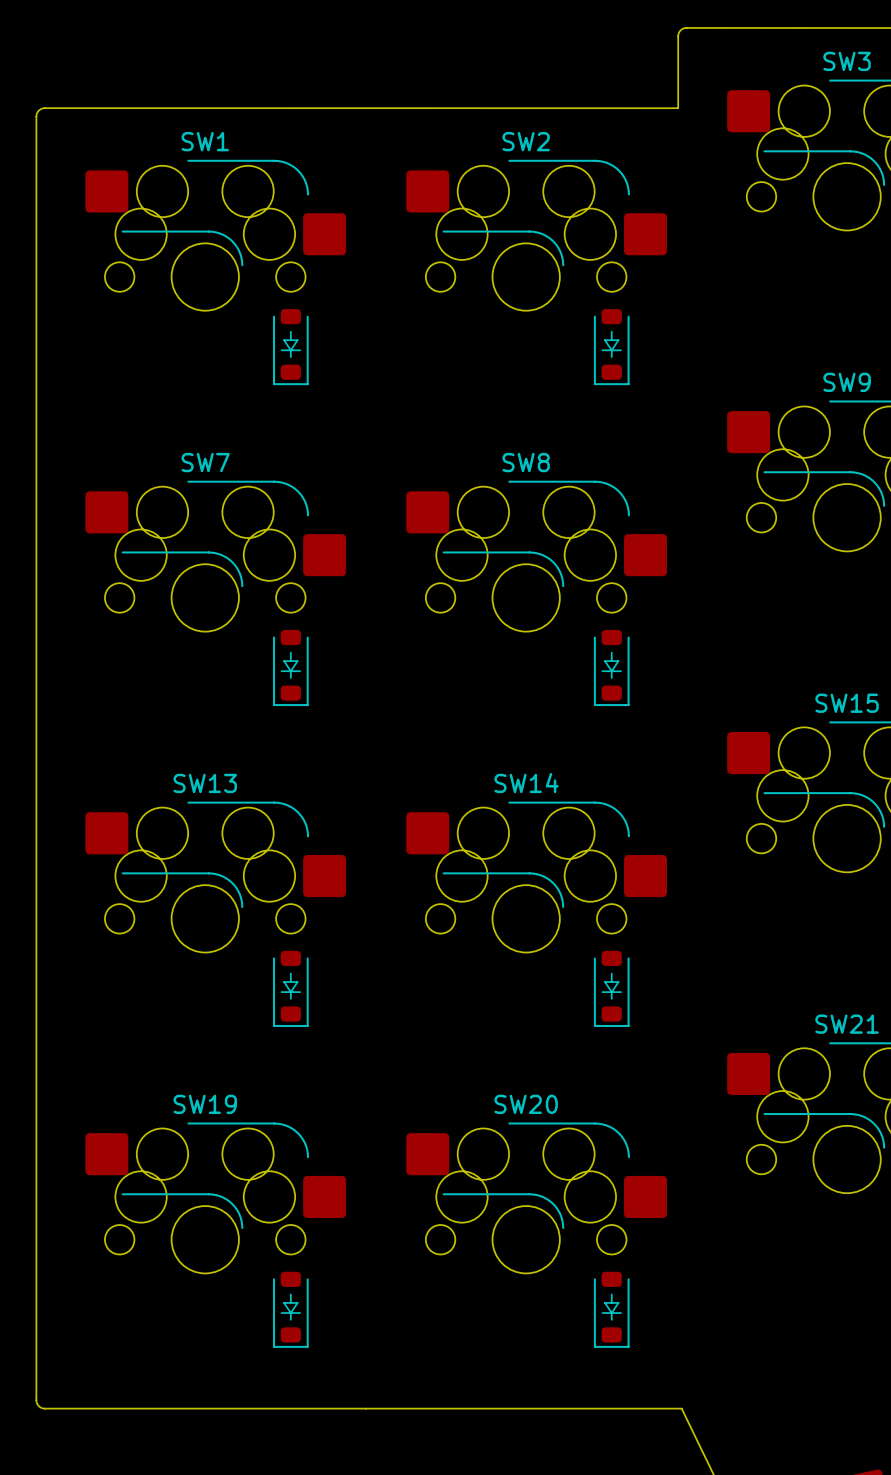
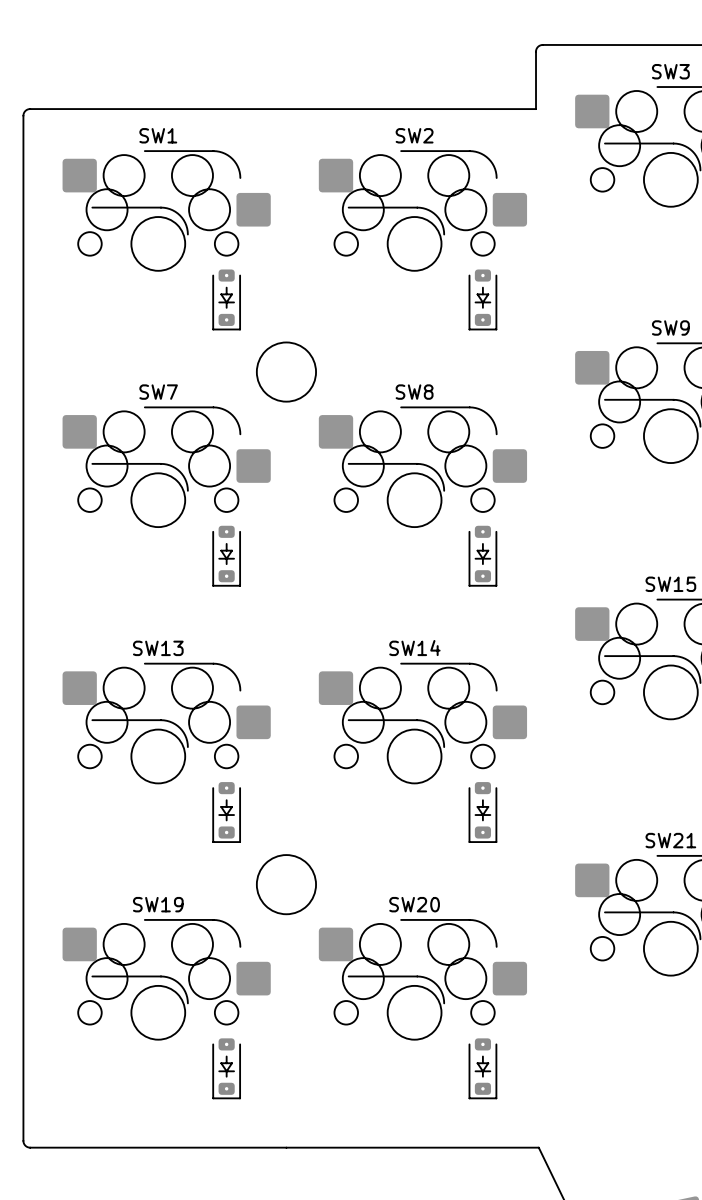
part footprint: [272, 309, 309, 386] -> [212, 269, 241, 331]
part footprint: [593, 309, 630, 386] -> [468, 269, 498, 331]
round board edge: none -> [256, 342, 317, 402]
part footprint: [272, 629, 309, 707] -> [212, 525, 241, 587]
part footprint: [593, 629, 630, 707] -> [468, 525, 498, 587]
part footprint: [272, 950, 309, 1027] -> [212, 782, 241, 843]
part footprint: [593, 950, 630, 1027] -> [468, 782, 498, 843]
round board edge: none -> [256, 854, 317, 915]
part footprint: [272, 1271, 309, 1348] -> [212, 1038, 241, 1100]
part footprint: [593, 1271, 630, 1348] -> [468, 1038, 498, 1100]

